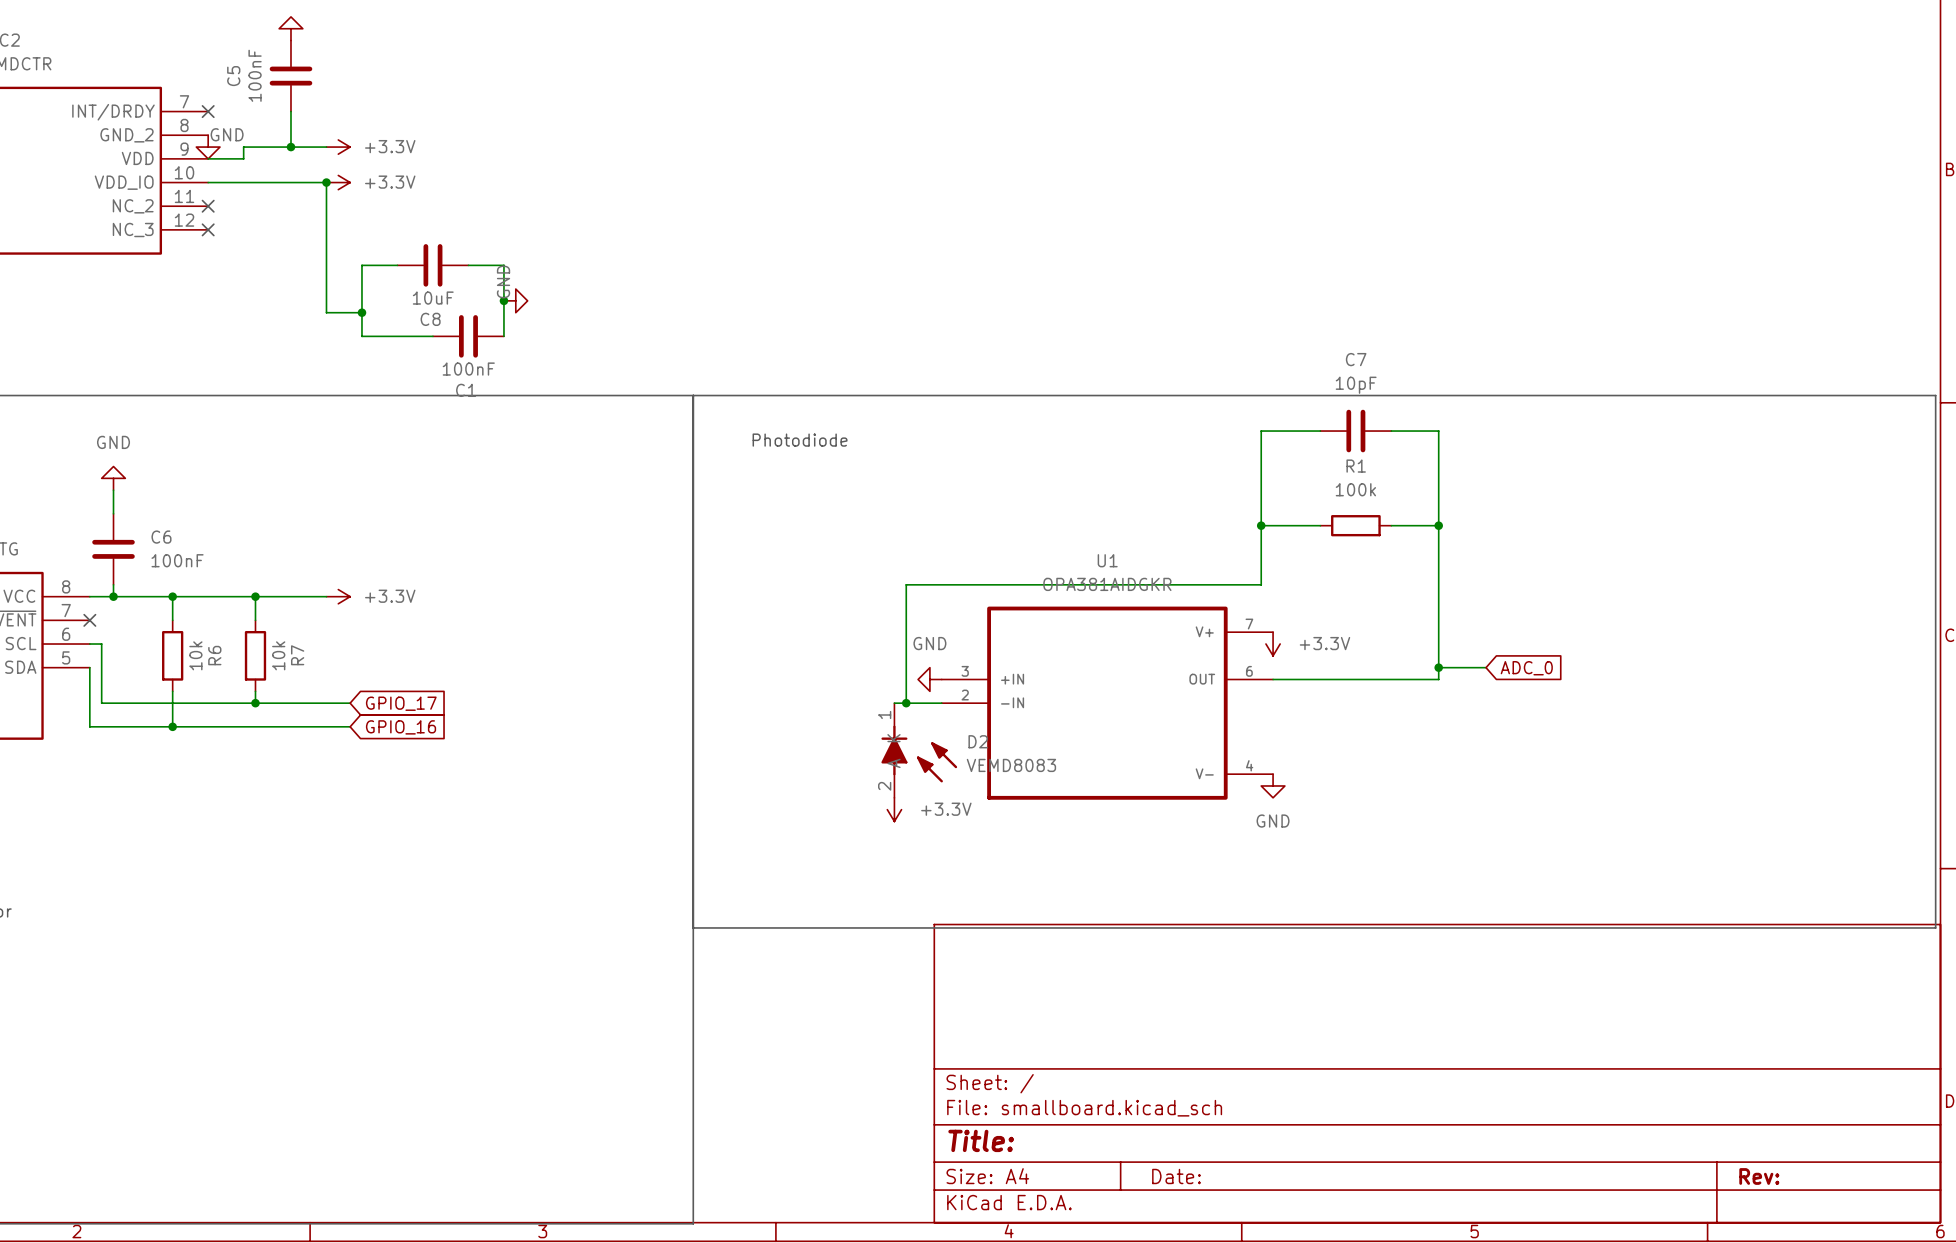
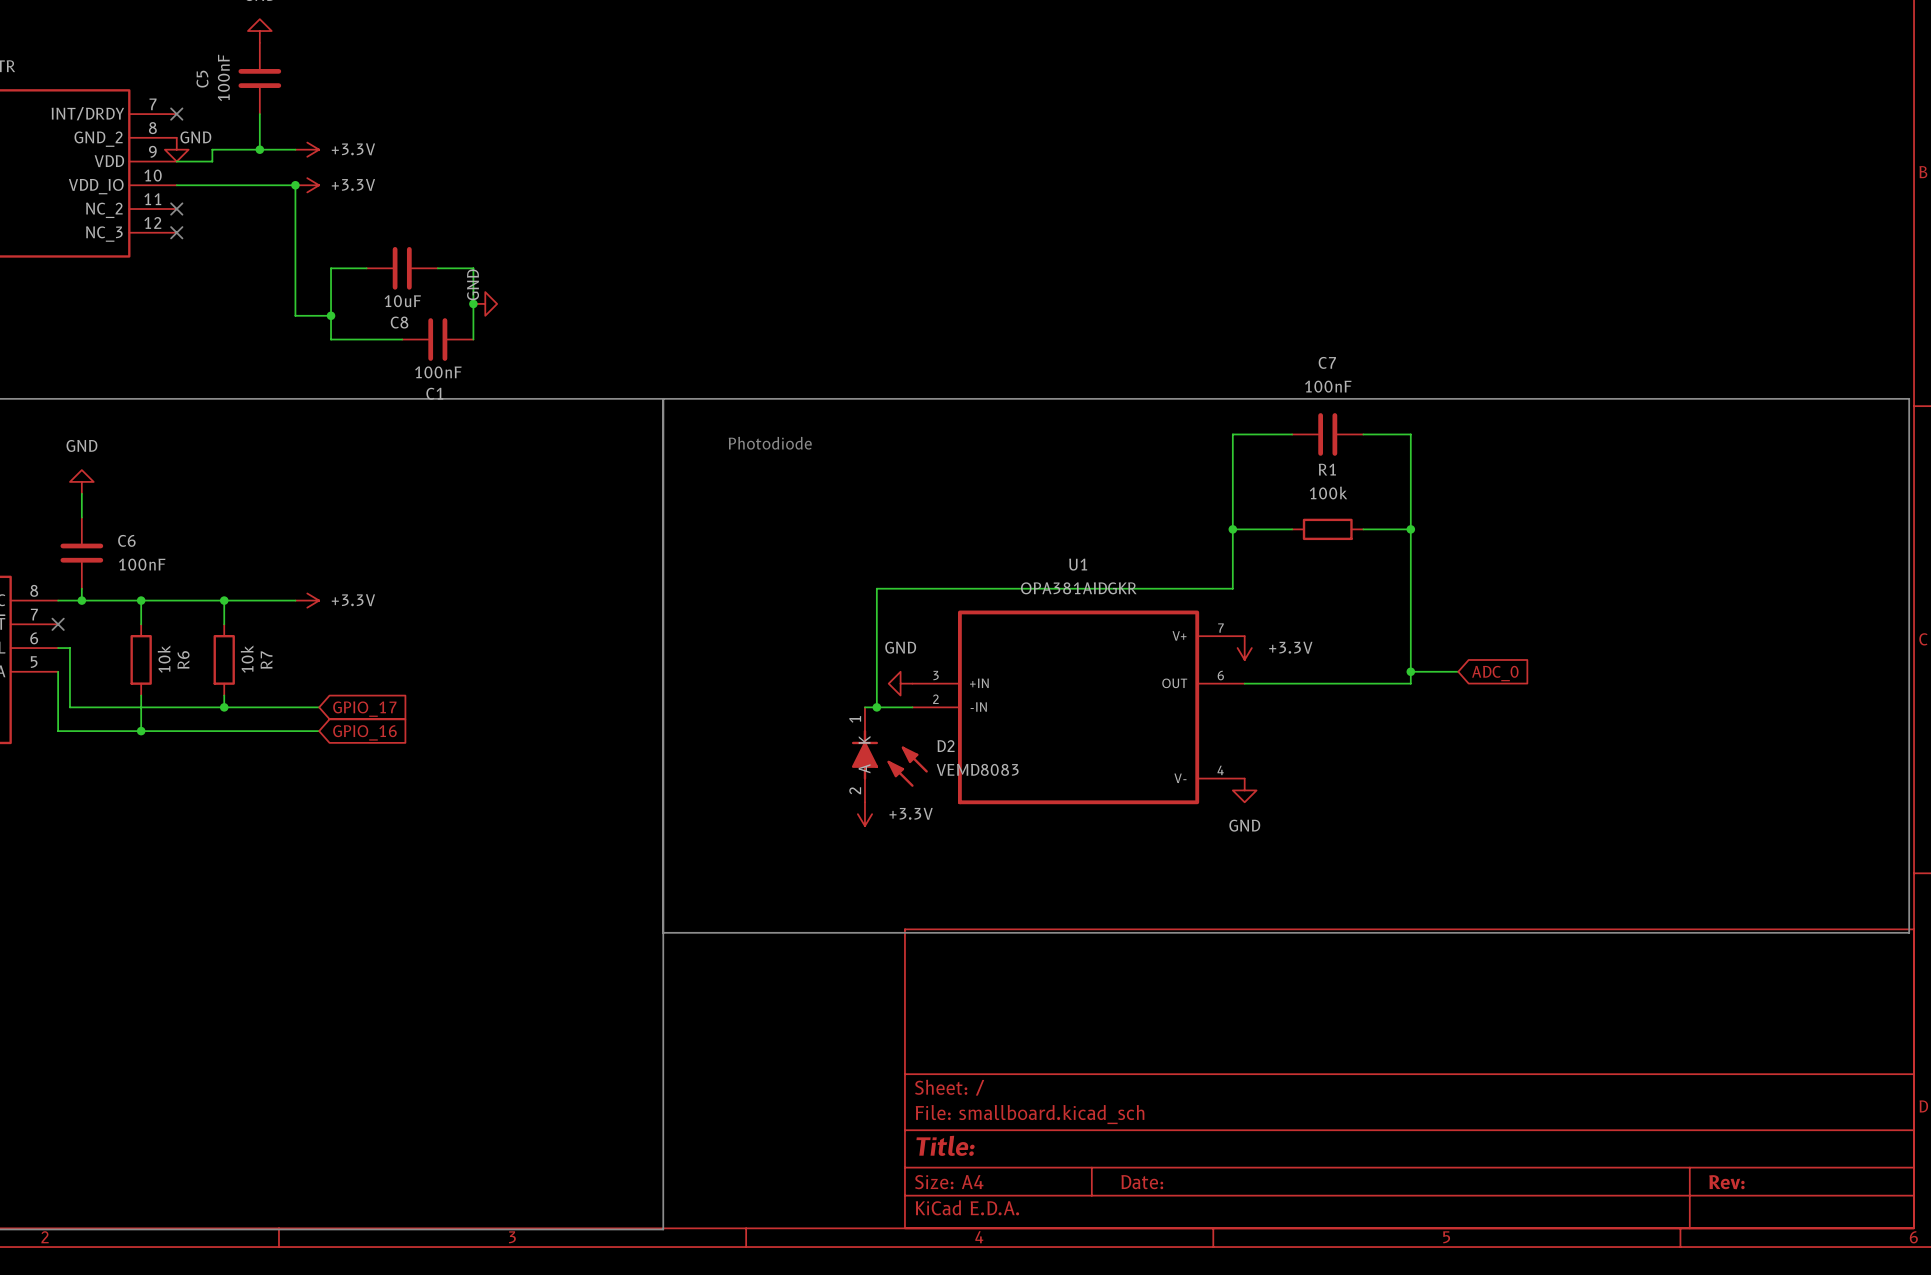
C7 value: 10pF (1356, 385) -> 100nF (1328, 386)

